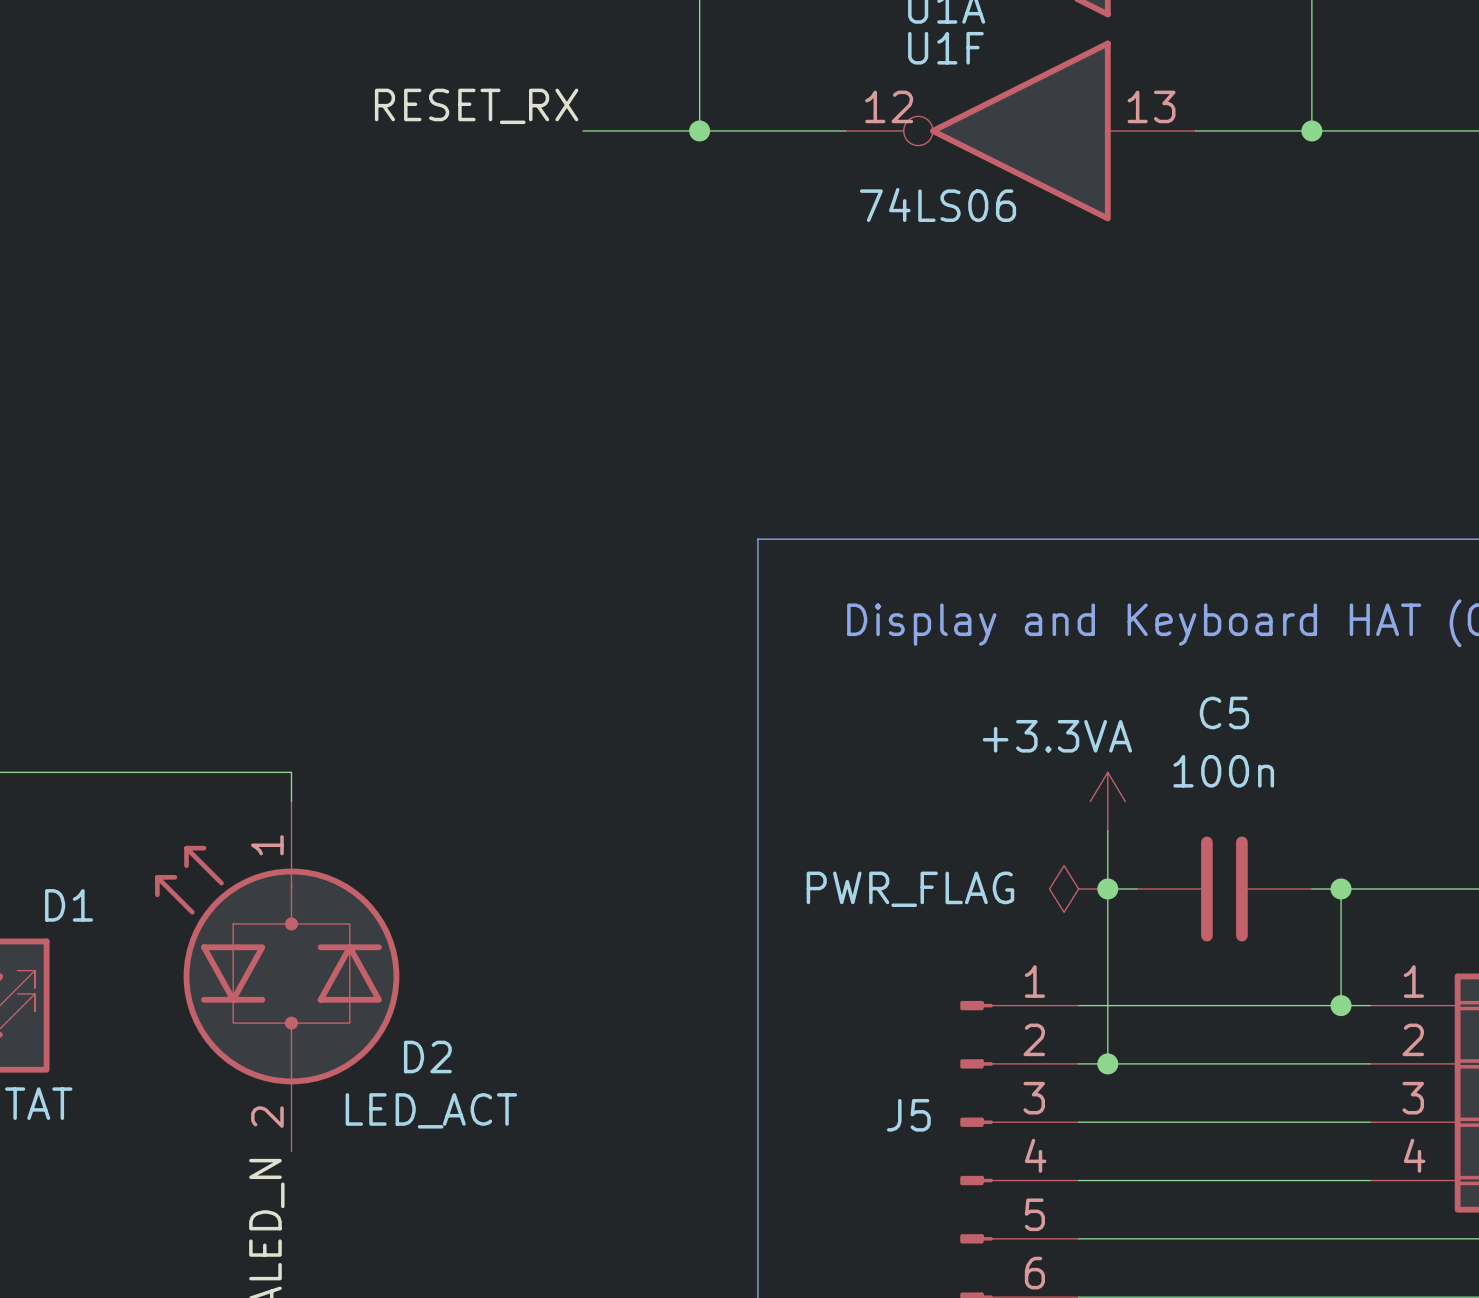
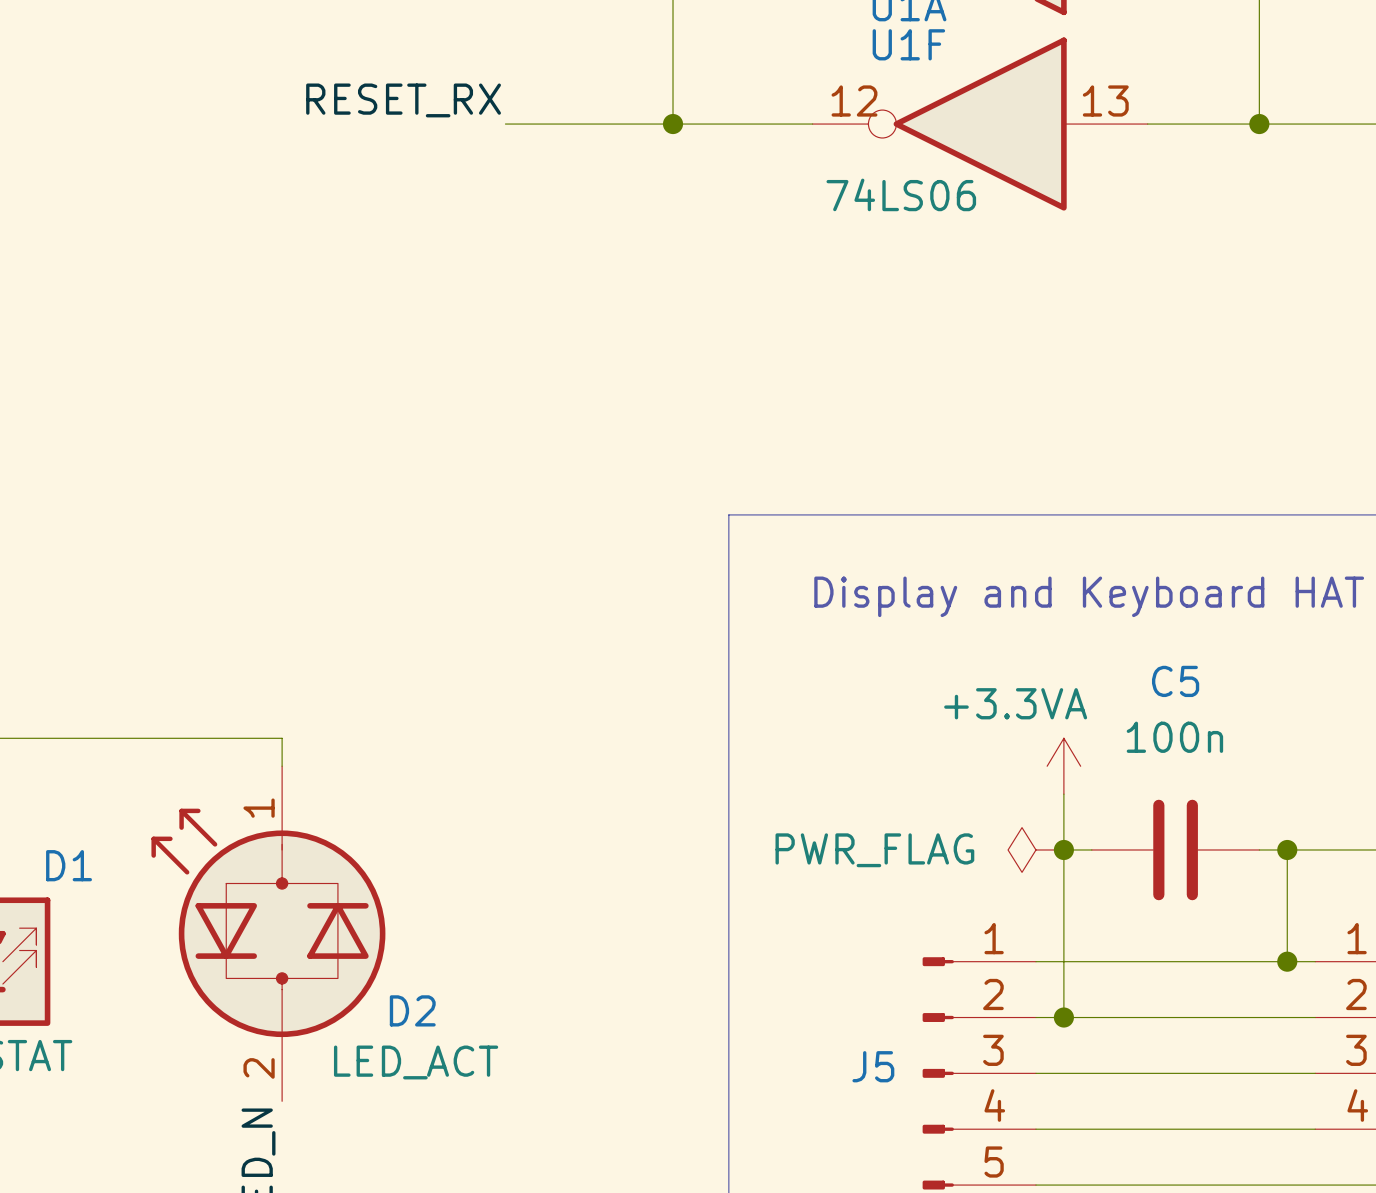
label position: RESET_RX (476, 106) -> RESET_RX (403, 100)
wire: none -> (505, 124) (561, 124)

